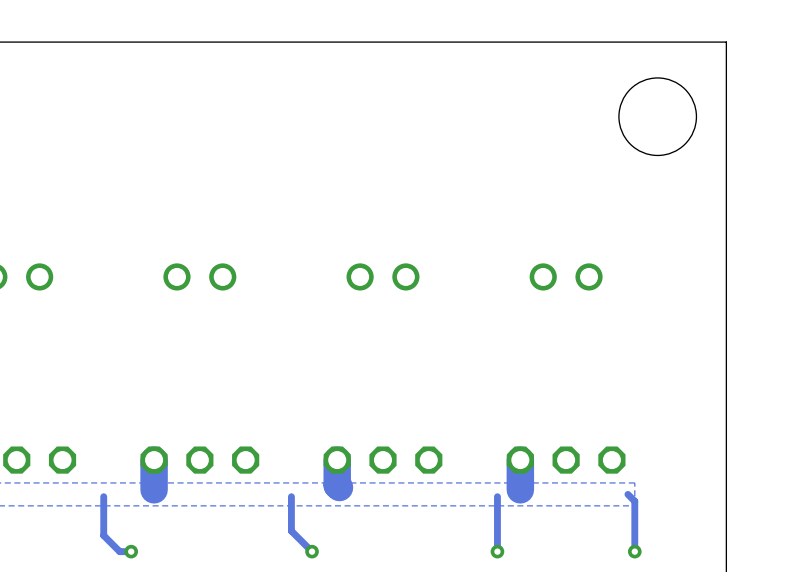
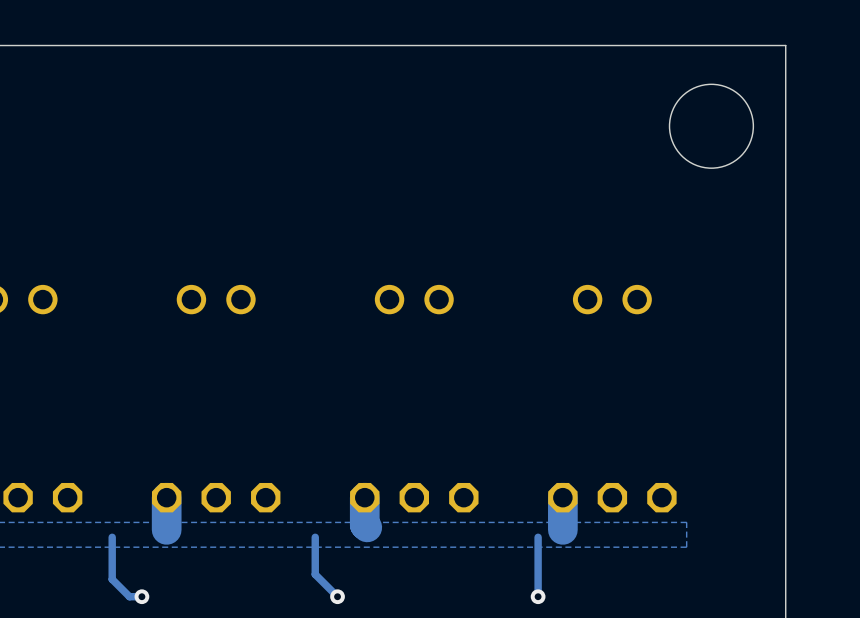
track: (627, 494) (634, 501) (634, 551) -> none
via: (634, 551) -> none

